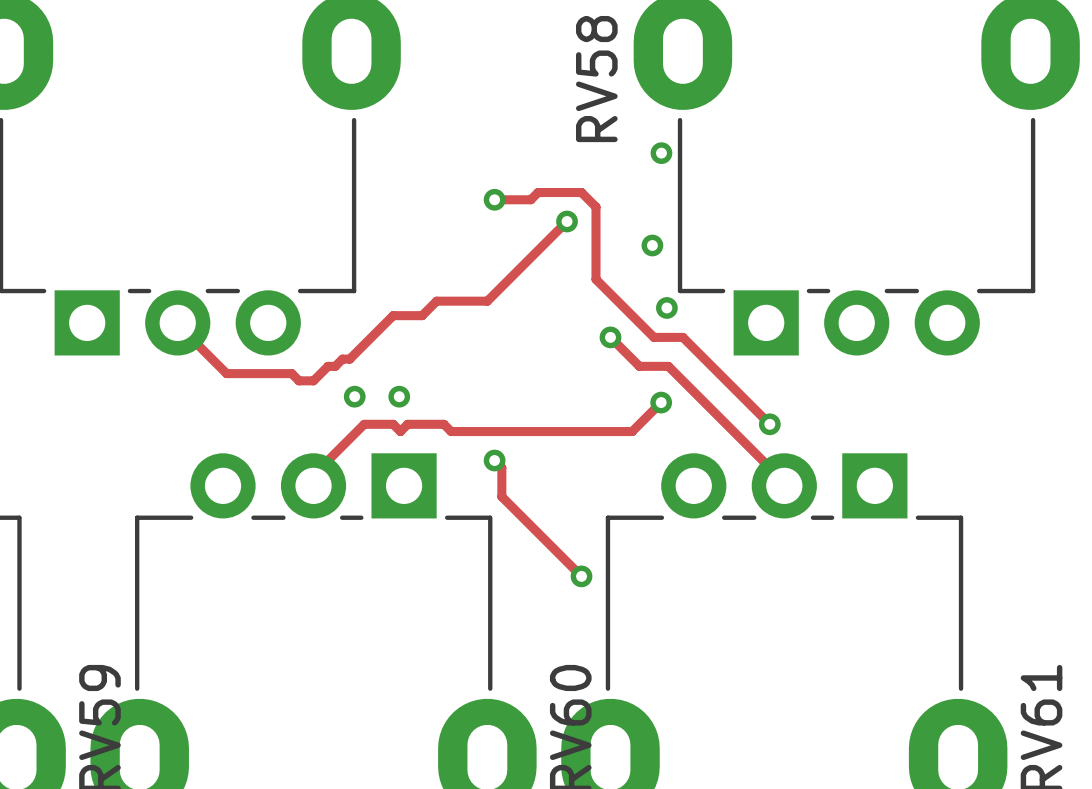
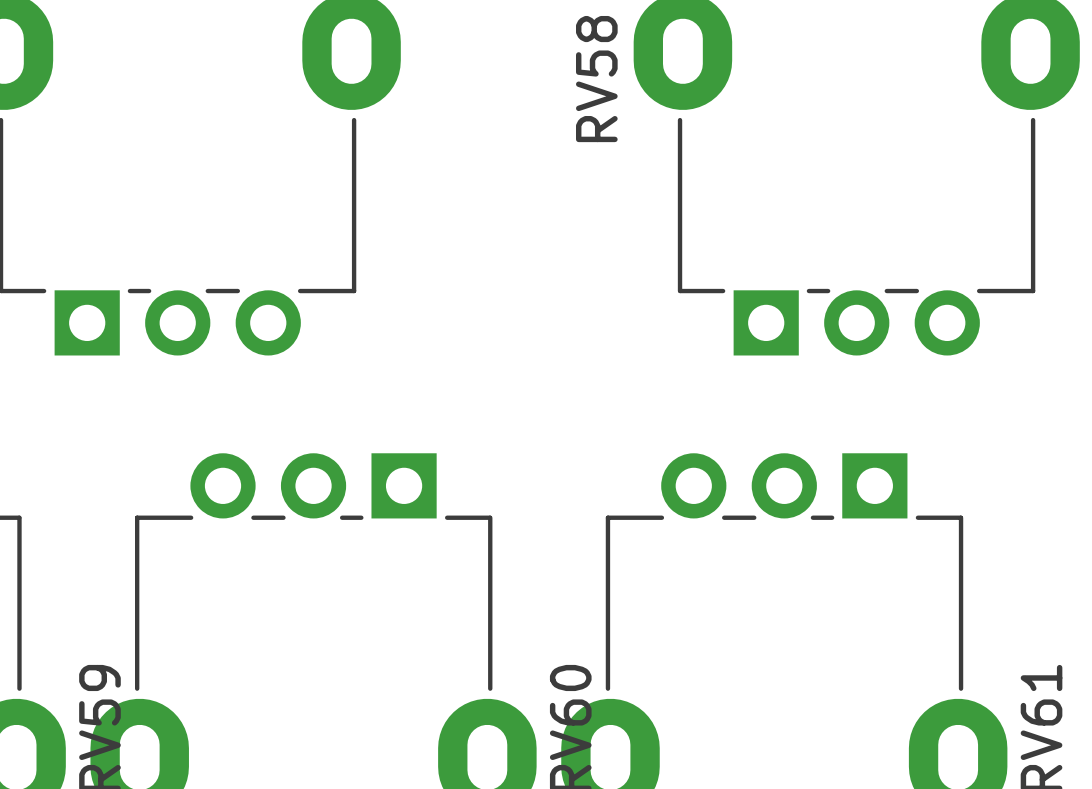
via: (661, 153) -> none
track: (494, 199) (530, 199) (538, 192) (581, 192) (596, 207) (596, 279) (653, 337) (682, 337) (769, 424) -> none
via: (494, 199) -> none
track: (567, 221) (487, 301) (436, 301) (422, 315) (393, 315) (349, 359) (342, 359) (335, 366) (328, 366) (313, 380) (299, 380) (291, 373) (226, 373) (175, 322) (177, 322) -> none
via: (567, 221) -> none
via: (652, 245) -> none
via: (666, 307) -> none
track: (610, 337) (639, 366) (668, 366) (784, 482) (784, 485) -> none
via: (610, 337) -> none
via: (354, 396) -> none
via: (399, 396) -> none
track: (661, 402) (632, 431) (451, 431) (443, 424) (407, 424) (400, 431) (393, 424) (364, 424) (328, 460) (328, 467) (313, 482) (313, 485) -> none
via: (661, 402) -> none
via: (769, 424) -> none
track: (494, 460) (501, 467) (501, 496) (581, 576) -> none
via: (494, 460) -> none
via: (581, 576) -> none

